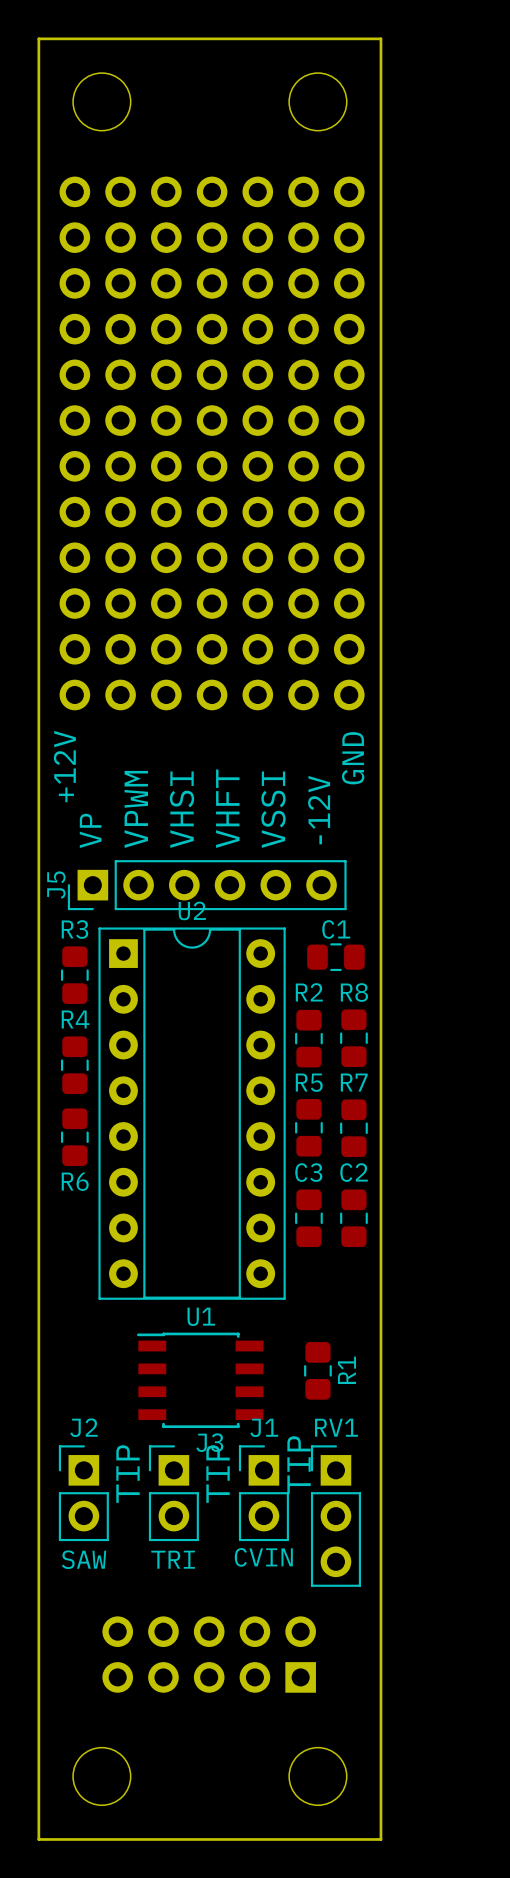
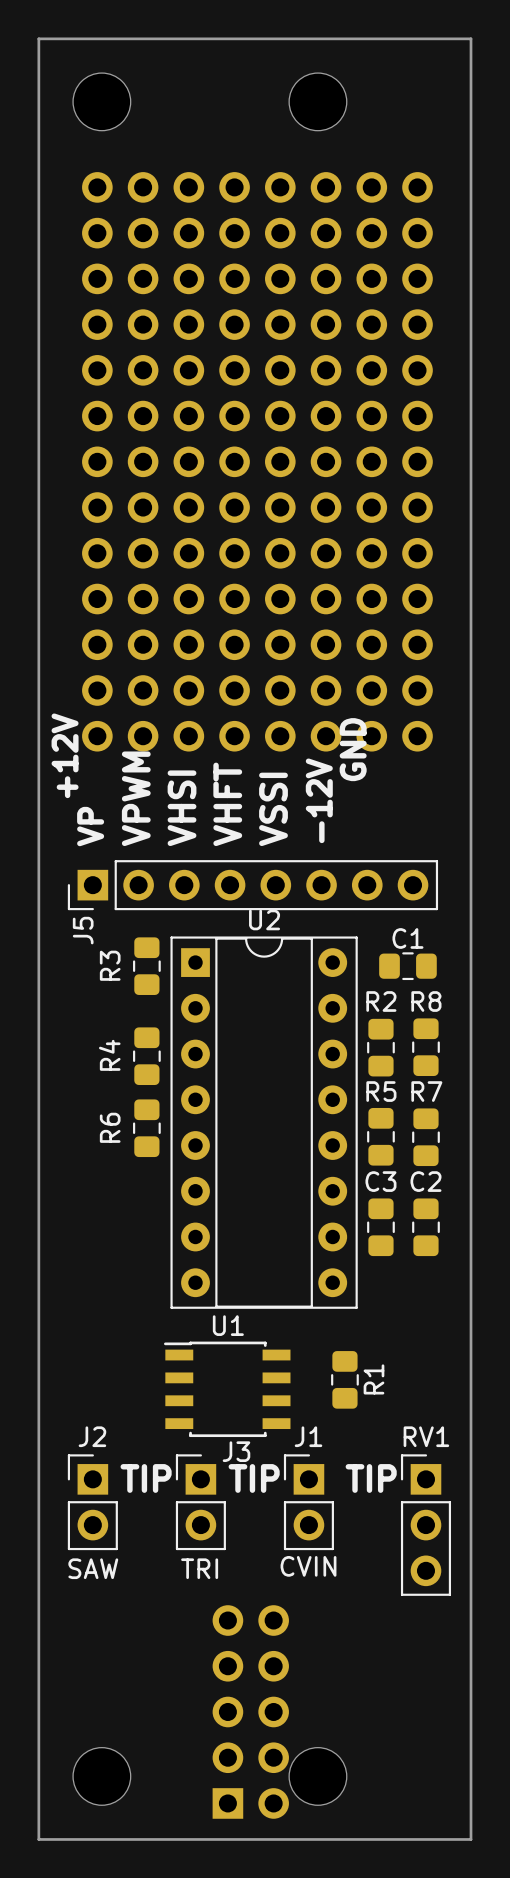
board edge: (380, 38) (380, 1839) -> (380, 38) (471, 38) (471, 1839) (380, 1839)
part: none -> (257, 187)
part: (212, 191) -> none
part: none -> (257, 233)
part: (212, 237) -> none
part: none -> (257, 278)
part: (212, 283) -> none
part: none -> (257, 324)
part: (212, 329) -> none
part: none -> (257, 370)
part: (212, 374) -> none
part: none -> (257, 416)
part: (212, 420) -> none
part: none -> (257, 461)
part: (212, 466) -> none
part: none -> (257, 507)
part: (212, 512) -> none
part: none -> (257, 553)
part: (212, 557) -> none
part: none -> (257, 599)
part: (212, 603) -> none
part: none -> (257, 644)
part: (212, 649) -> none
part: none -> (257, 690)
part: (212, 694) -> none
part: none -> (257, 736)
J5 footprint: [67, 860, 347, 911] -> [67, 860, 439, 911]
J5 name position: J5 (56, 885) -> J5 (83, 930)
R3 name rotation: 0° (74, 929) -> 90° counterclockwise (110, 965)
R3 name position: R3 (74, 929) -> R3 (110, 965)
C1 position: (335, 957) -> (407, 966)
R3 position: (74, 975) -> (146, 966)
R4 name rotation: 0° (75, 1019) -> 90° counterclockwise (109, 1055)
R4 name position: R4 (75, 1019) -> R4 (109, 1055)
R2 position: (308, 1038) -> (380, 1047)
R8 position: (353, 1038) -> (425, 1047)
R4 position: (74, 1065) -> (146, 1056)
U2 position: (192, 1113) -> (264, 1122)
R5 position: (308, 1127) -> (380, 1136)
R7 position: (353, 1128) -> (425, 1137)
R6 position: (74, 1137) -> (146, 1128)
R6 name rotation: 0° (75, 1181) -> 90° counterclockwise (110, 1127)
R6 name position: R6 (75, 1181) -> R6 (110, 1127)
C3 position: (308, 1218) -> (380, 1227)
C2 position: (353, 1218) -> (425, 1227)
R1 position: (317, 1370) -> (344, 1379)
U1 position: (200, 1380) -> (227, 1389)
text: TIP (299, 1465) -> none
text rotation: 0° (128, 1474) -> 90° clockwise (146, 1478)
text: TIP (218, 1474) -> none
text: none -> TIP (254, 1478)
text: none -> TIP (371, 1478)
J2 position: (83, 1493) -> (92, 1502)
J3 position: (173, 1493) -> (200, 1502)
J1 position: (263, 1493) -> (308, 1502)
RV1 position: (335, 1516) -> (425, 1525)
part rotation: 0° (209, 1654) -> 90° clockwise (250, 1711)

